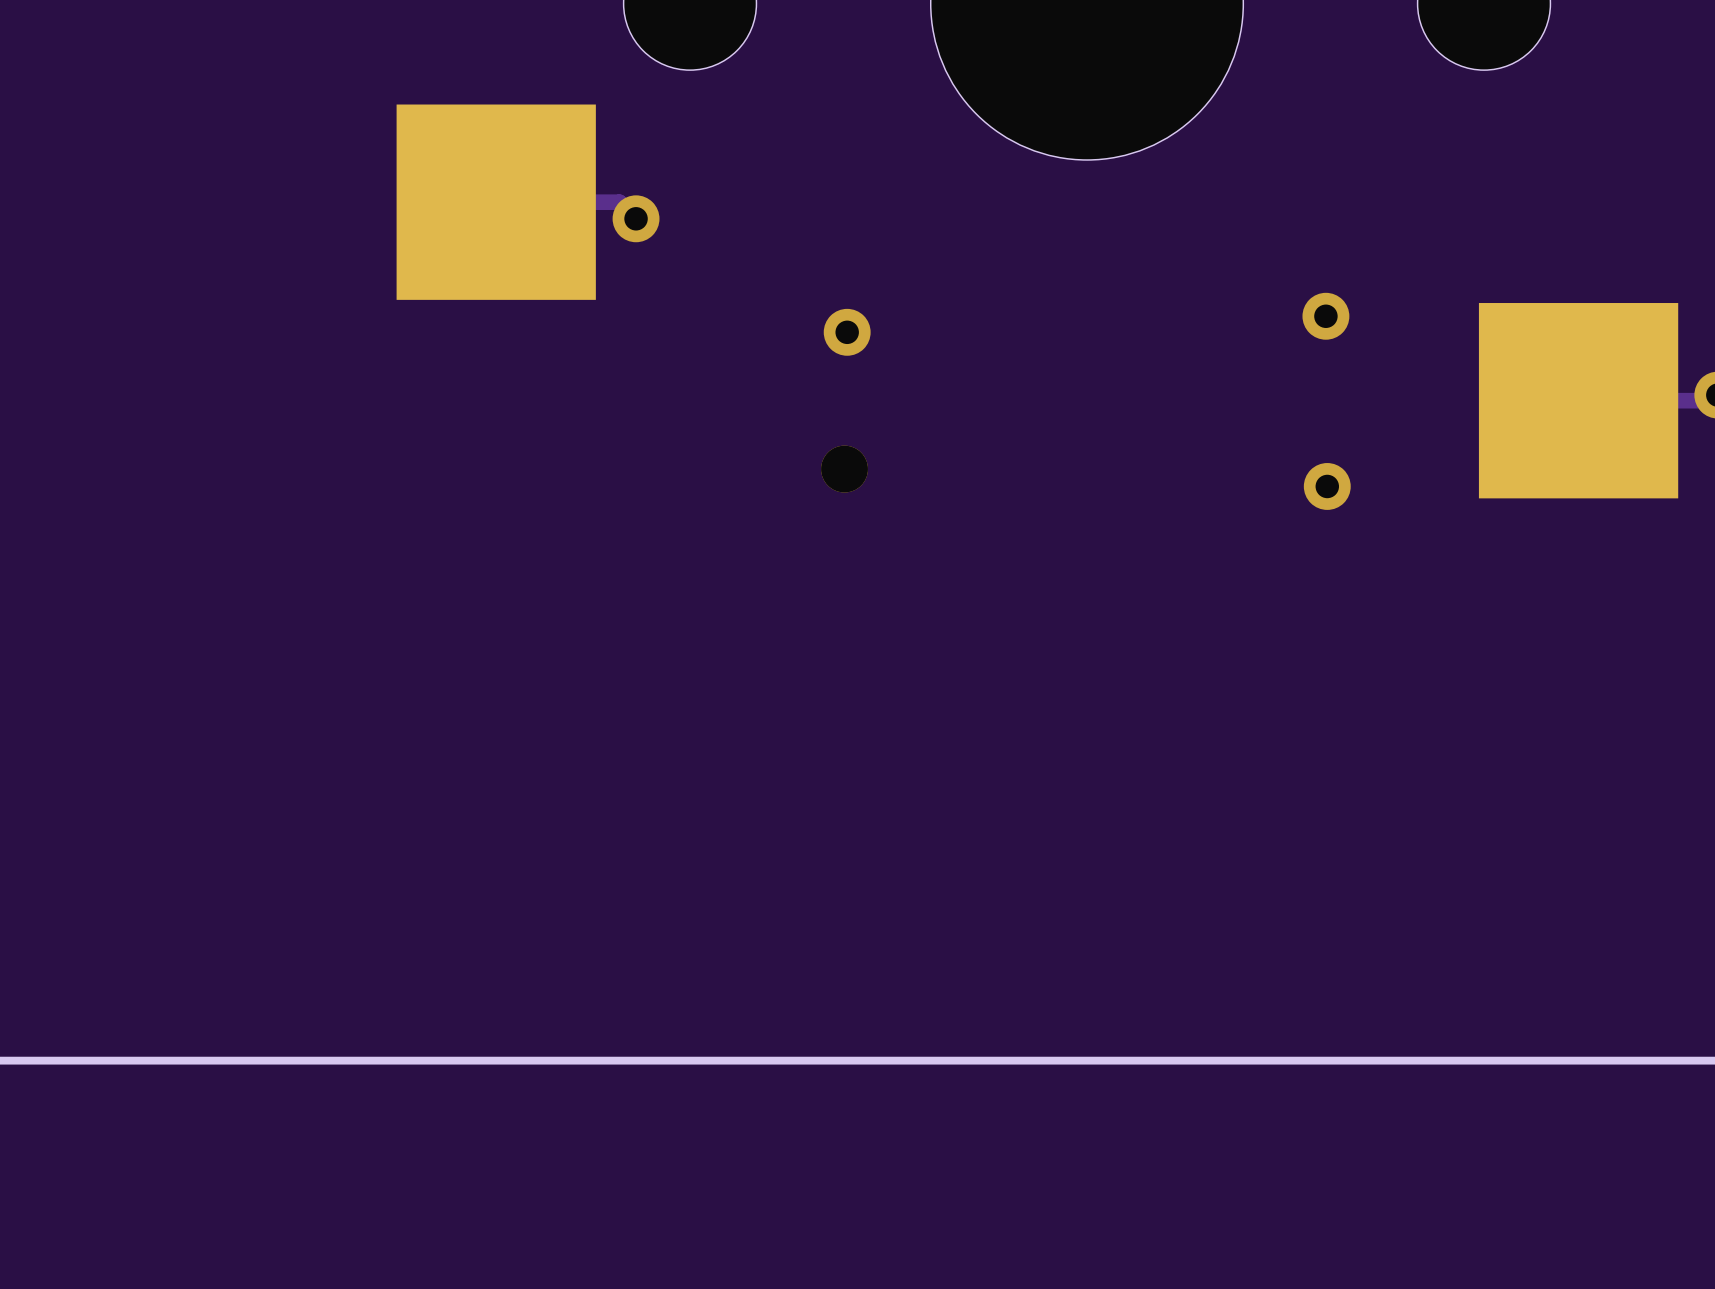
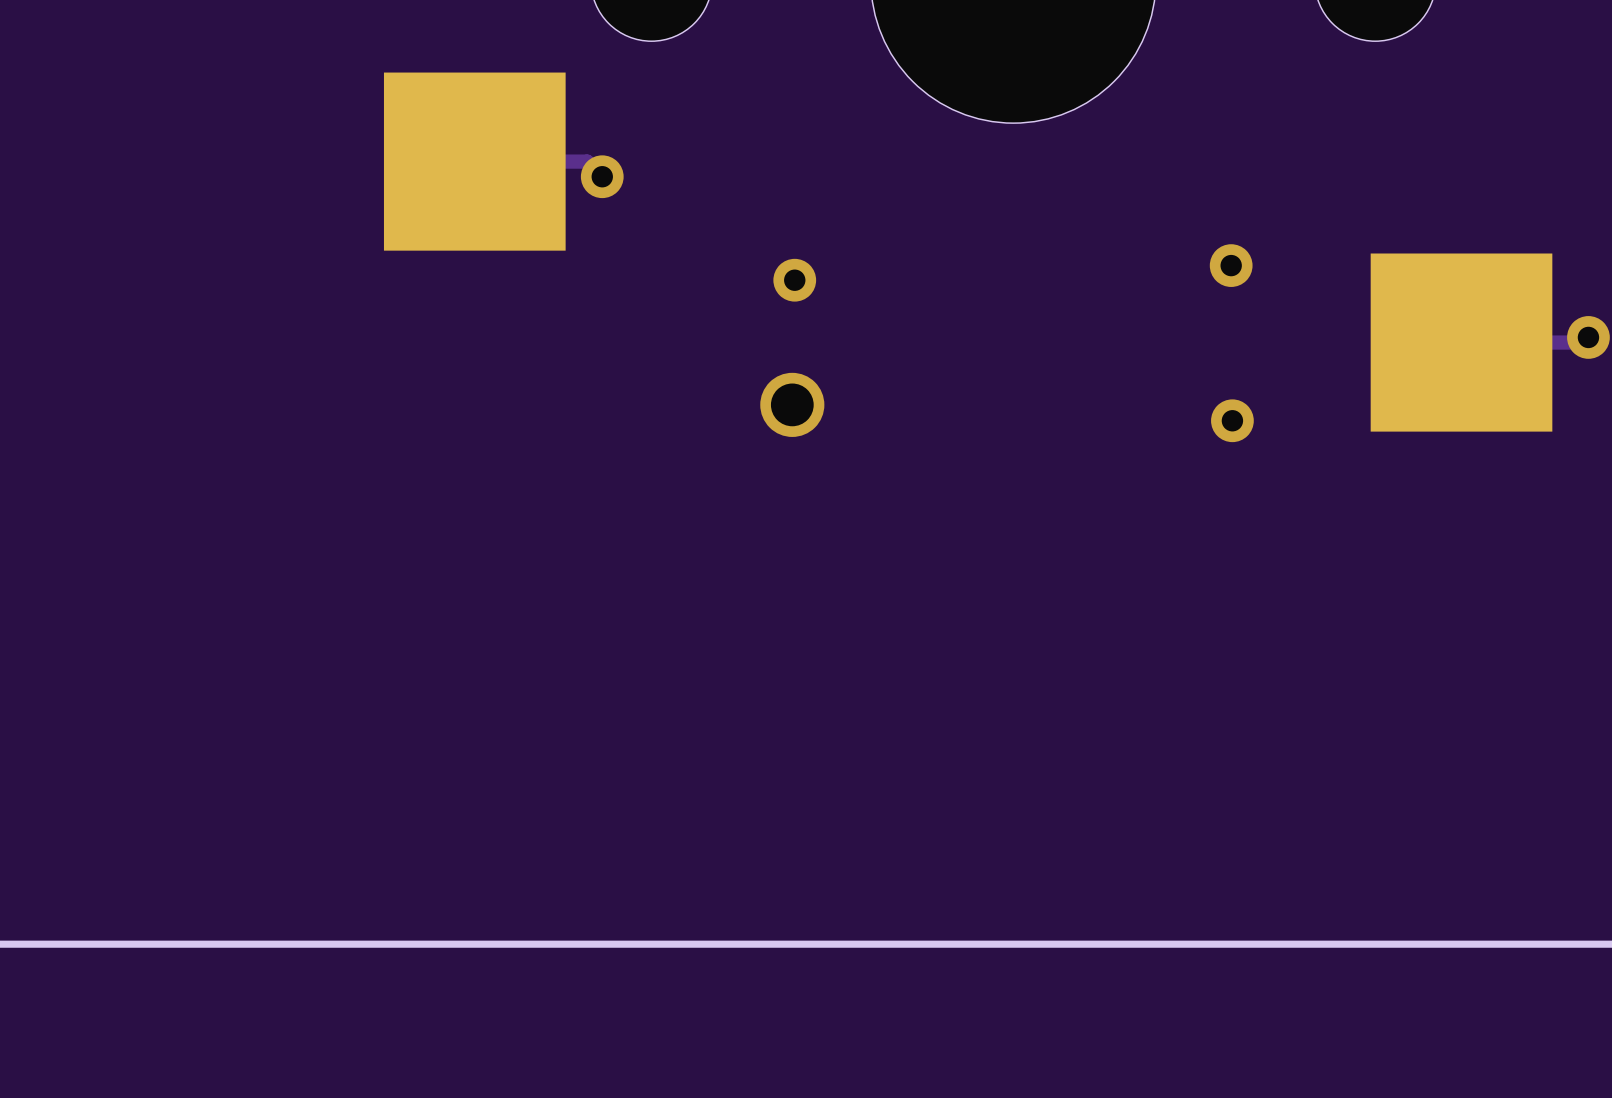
via size: [821, 445, 868, 493] -> [760, 372, 825, 437]

